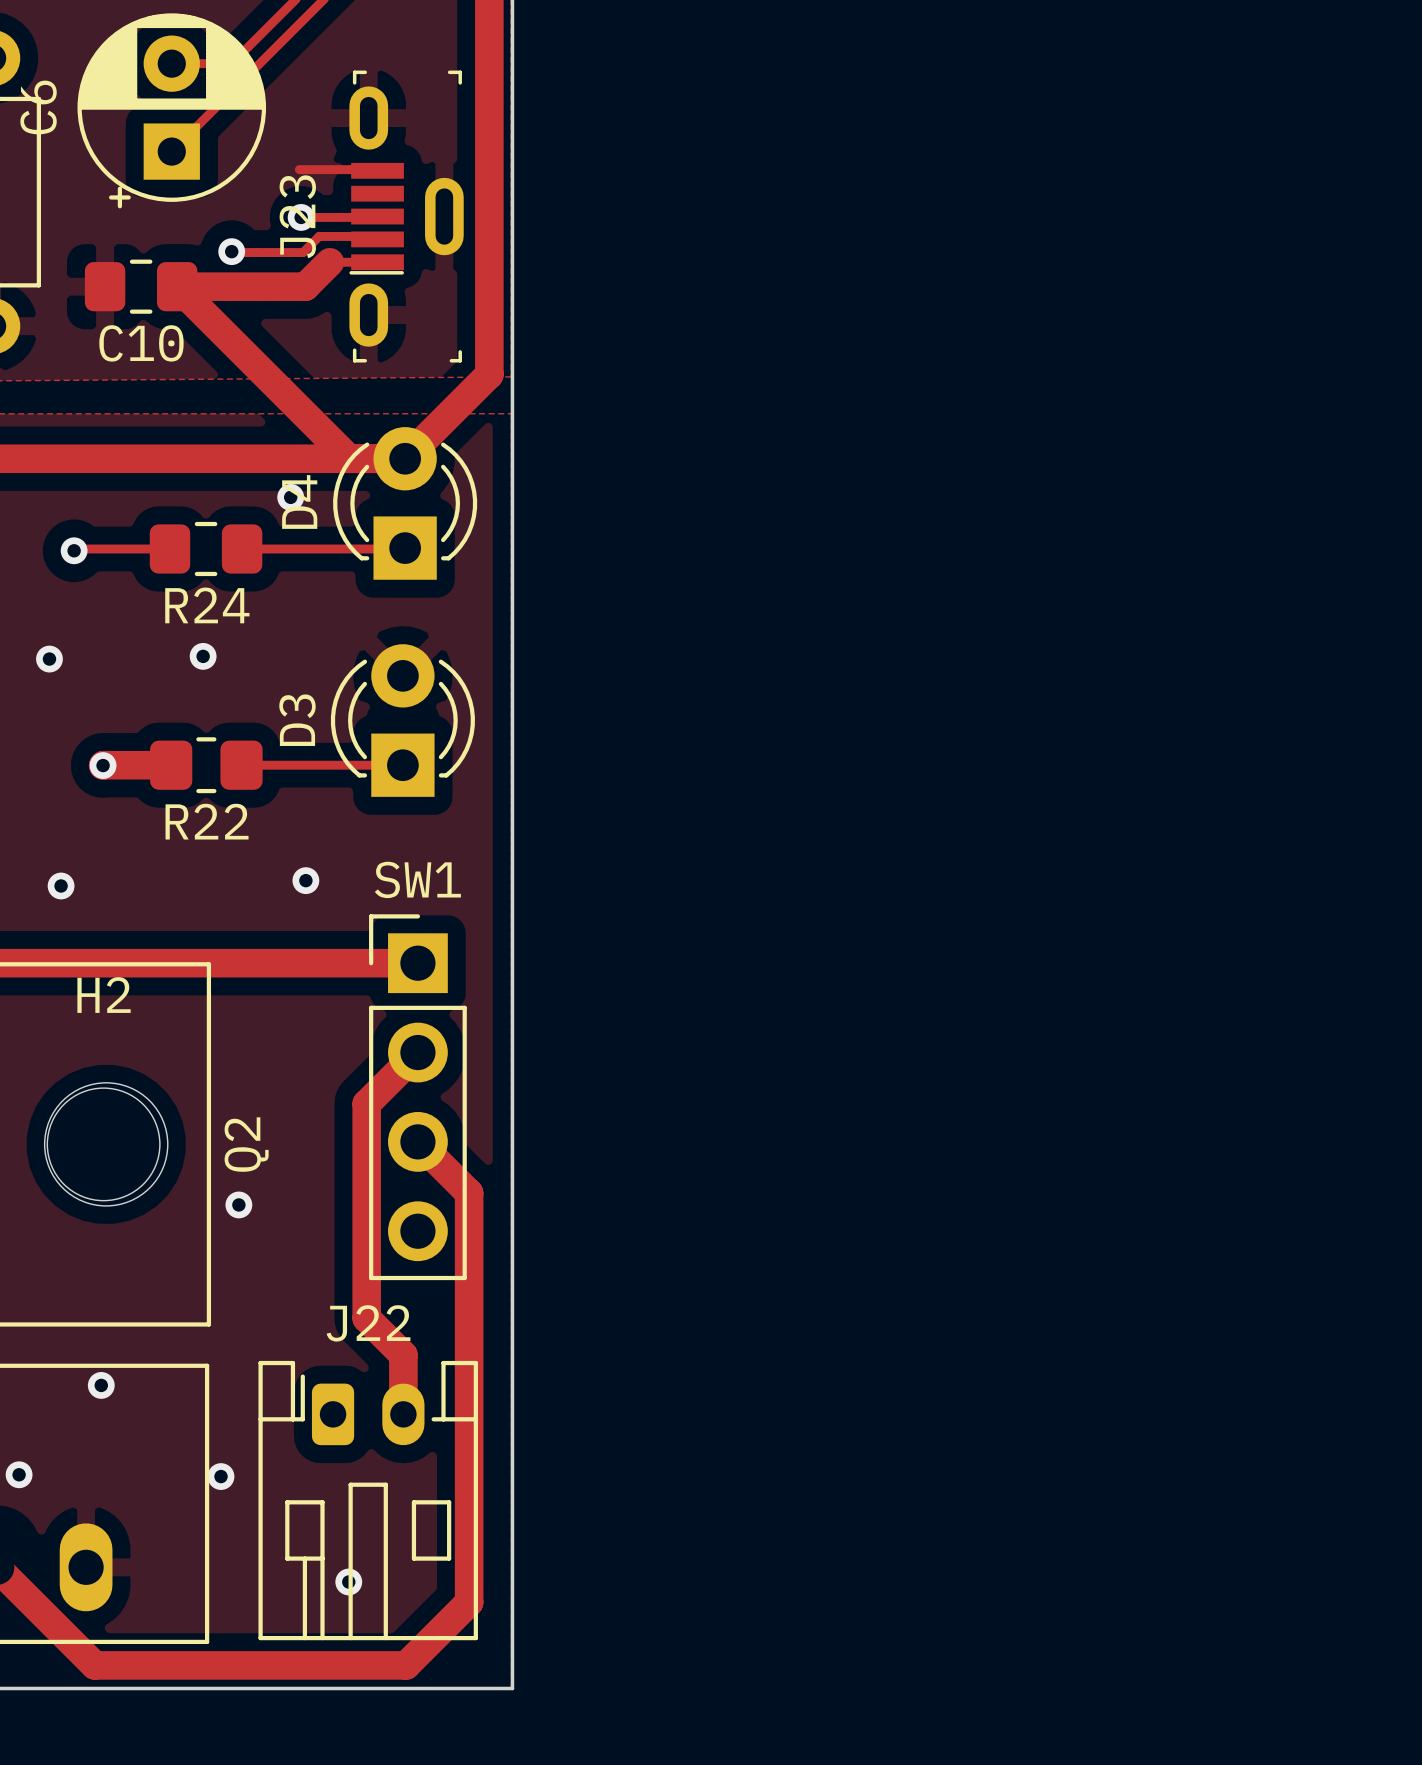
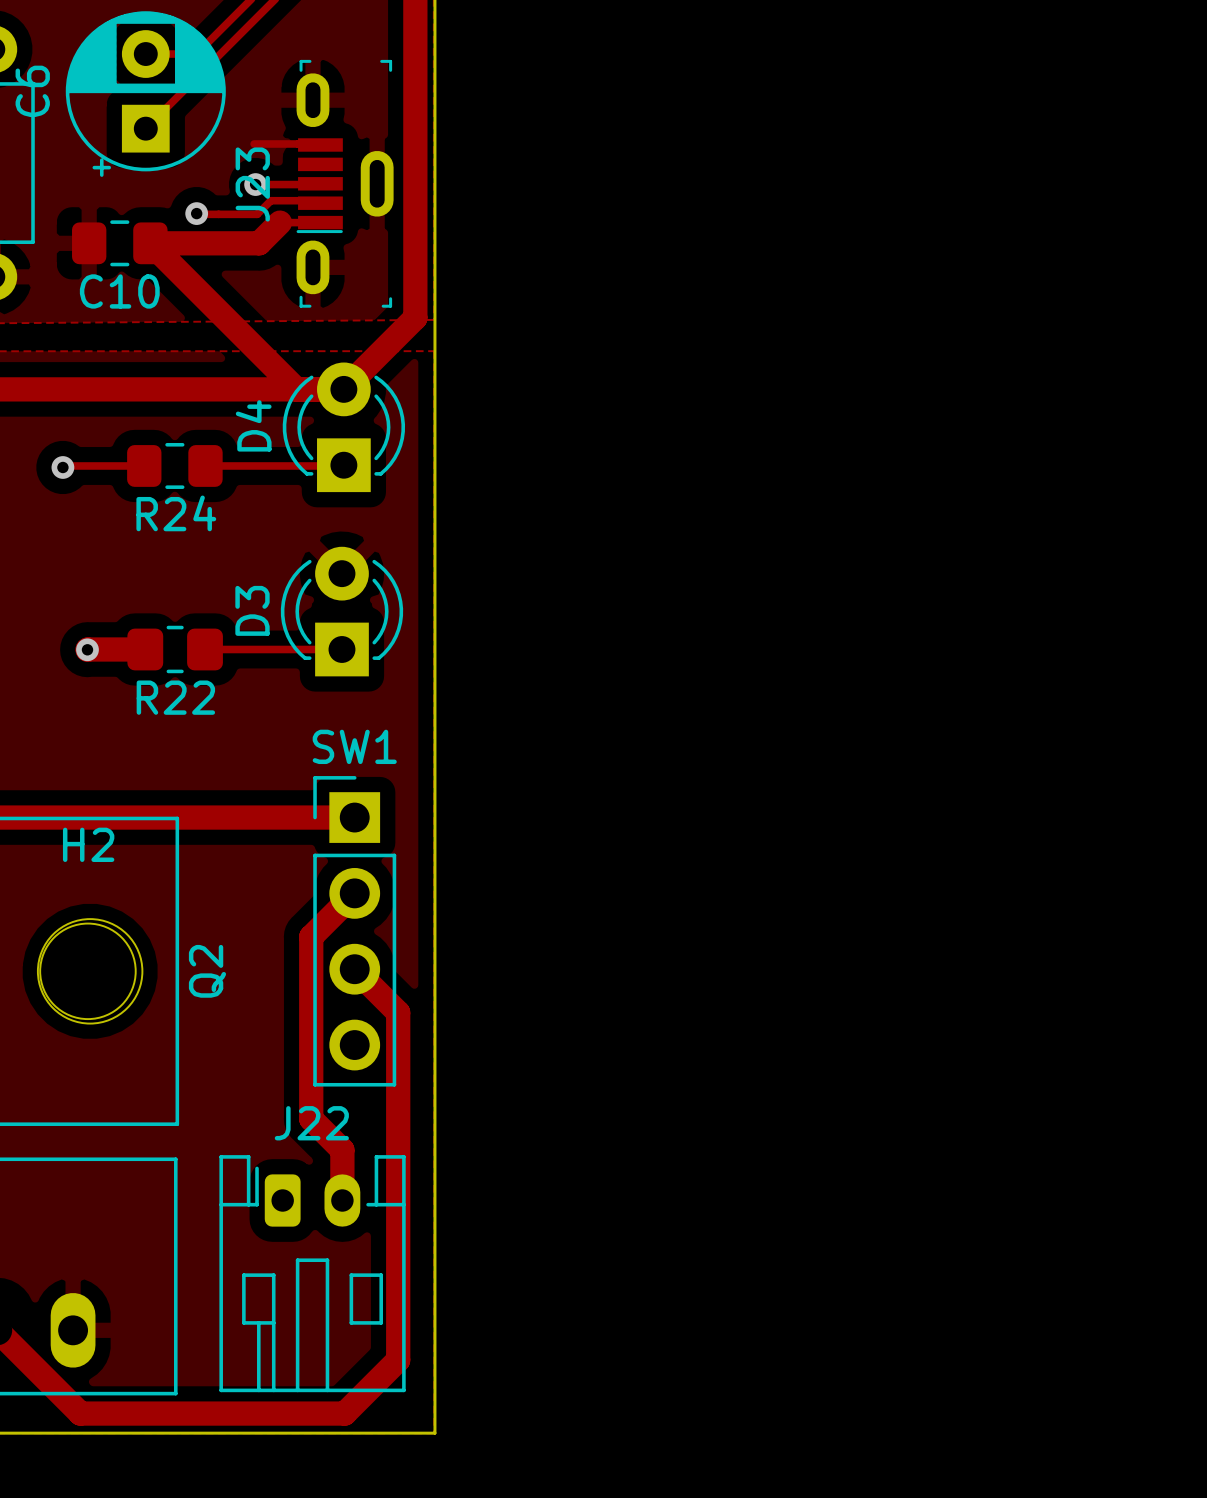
via: (290, 497) -> none
via: (203, 656) -> none
via: (49, 659) -> none
via: (305, 880) -> none
via: (61, 886) -> none
via: (238, 1204) -> none
via: (101, 1385) -> none
via: (19, 1474) -> none
via: (221, 1476) -> none
via: (348, 1581) -> none

